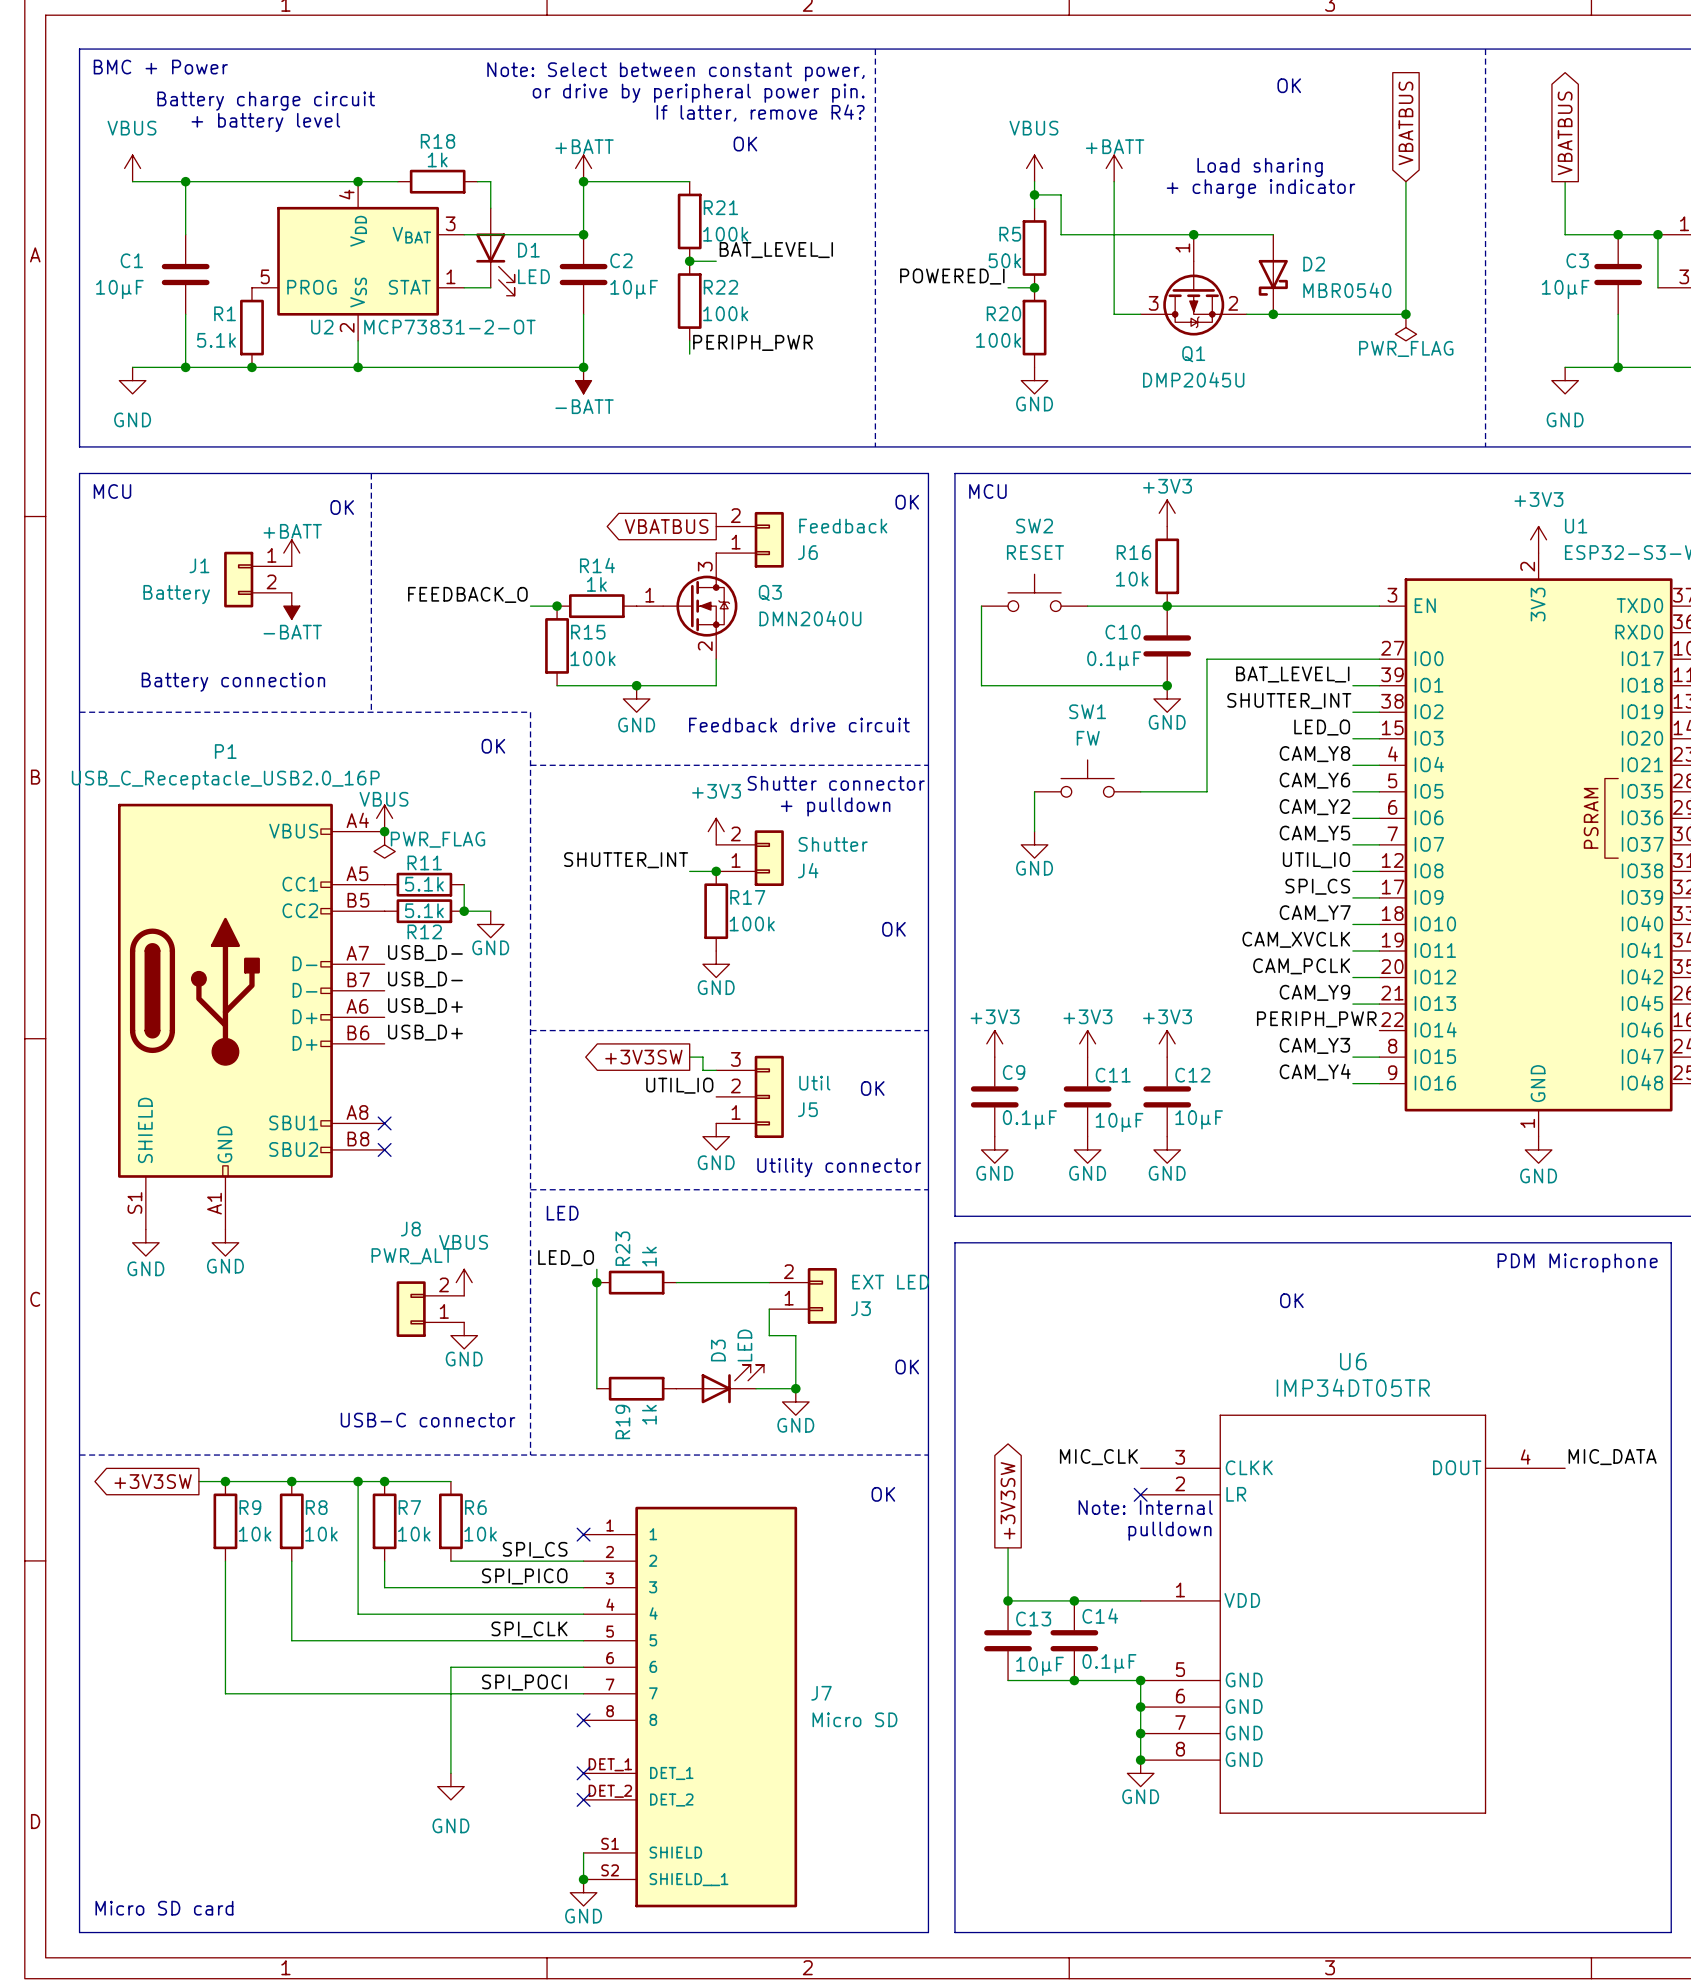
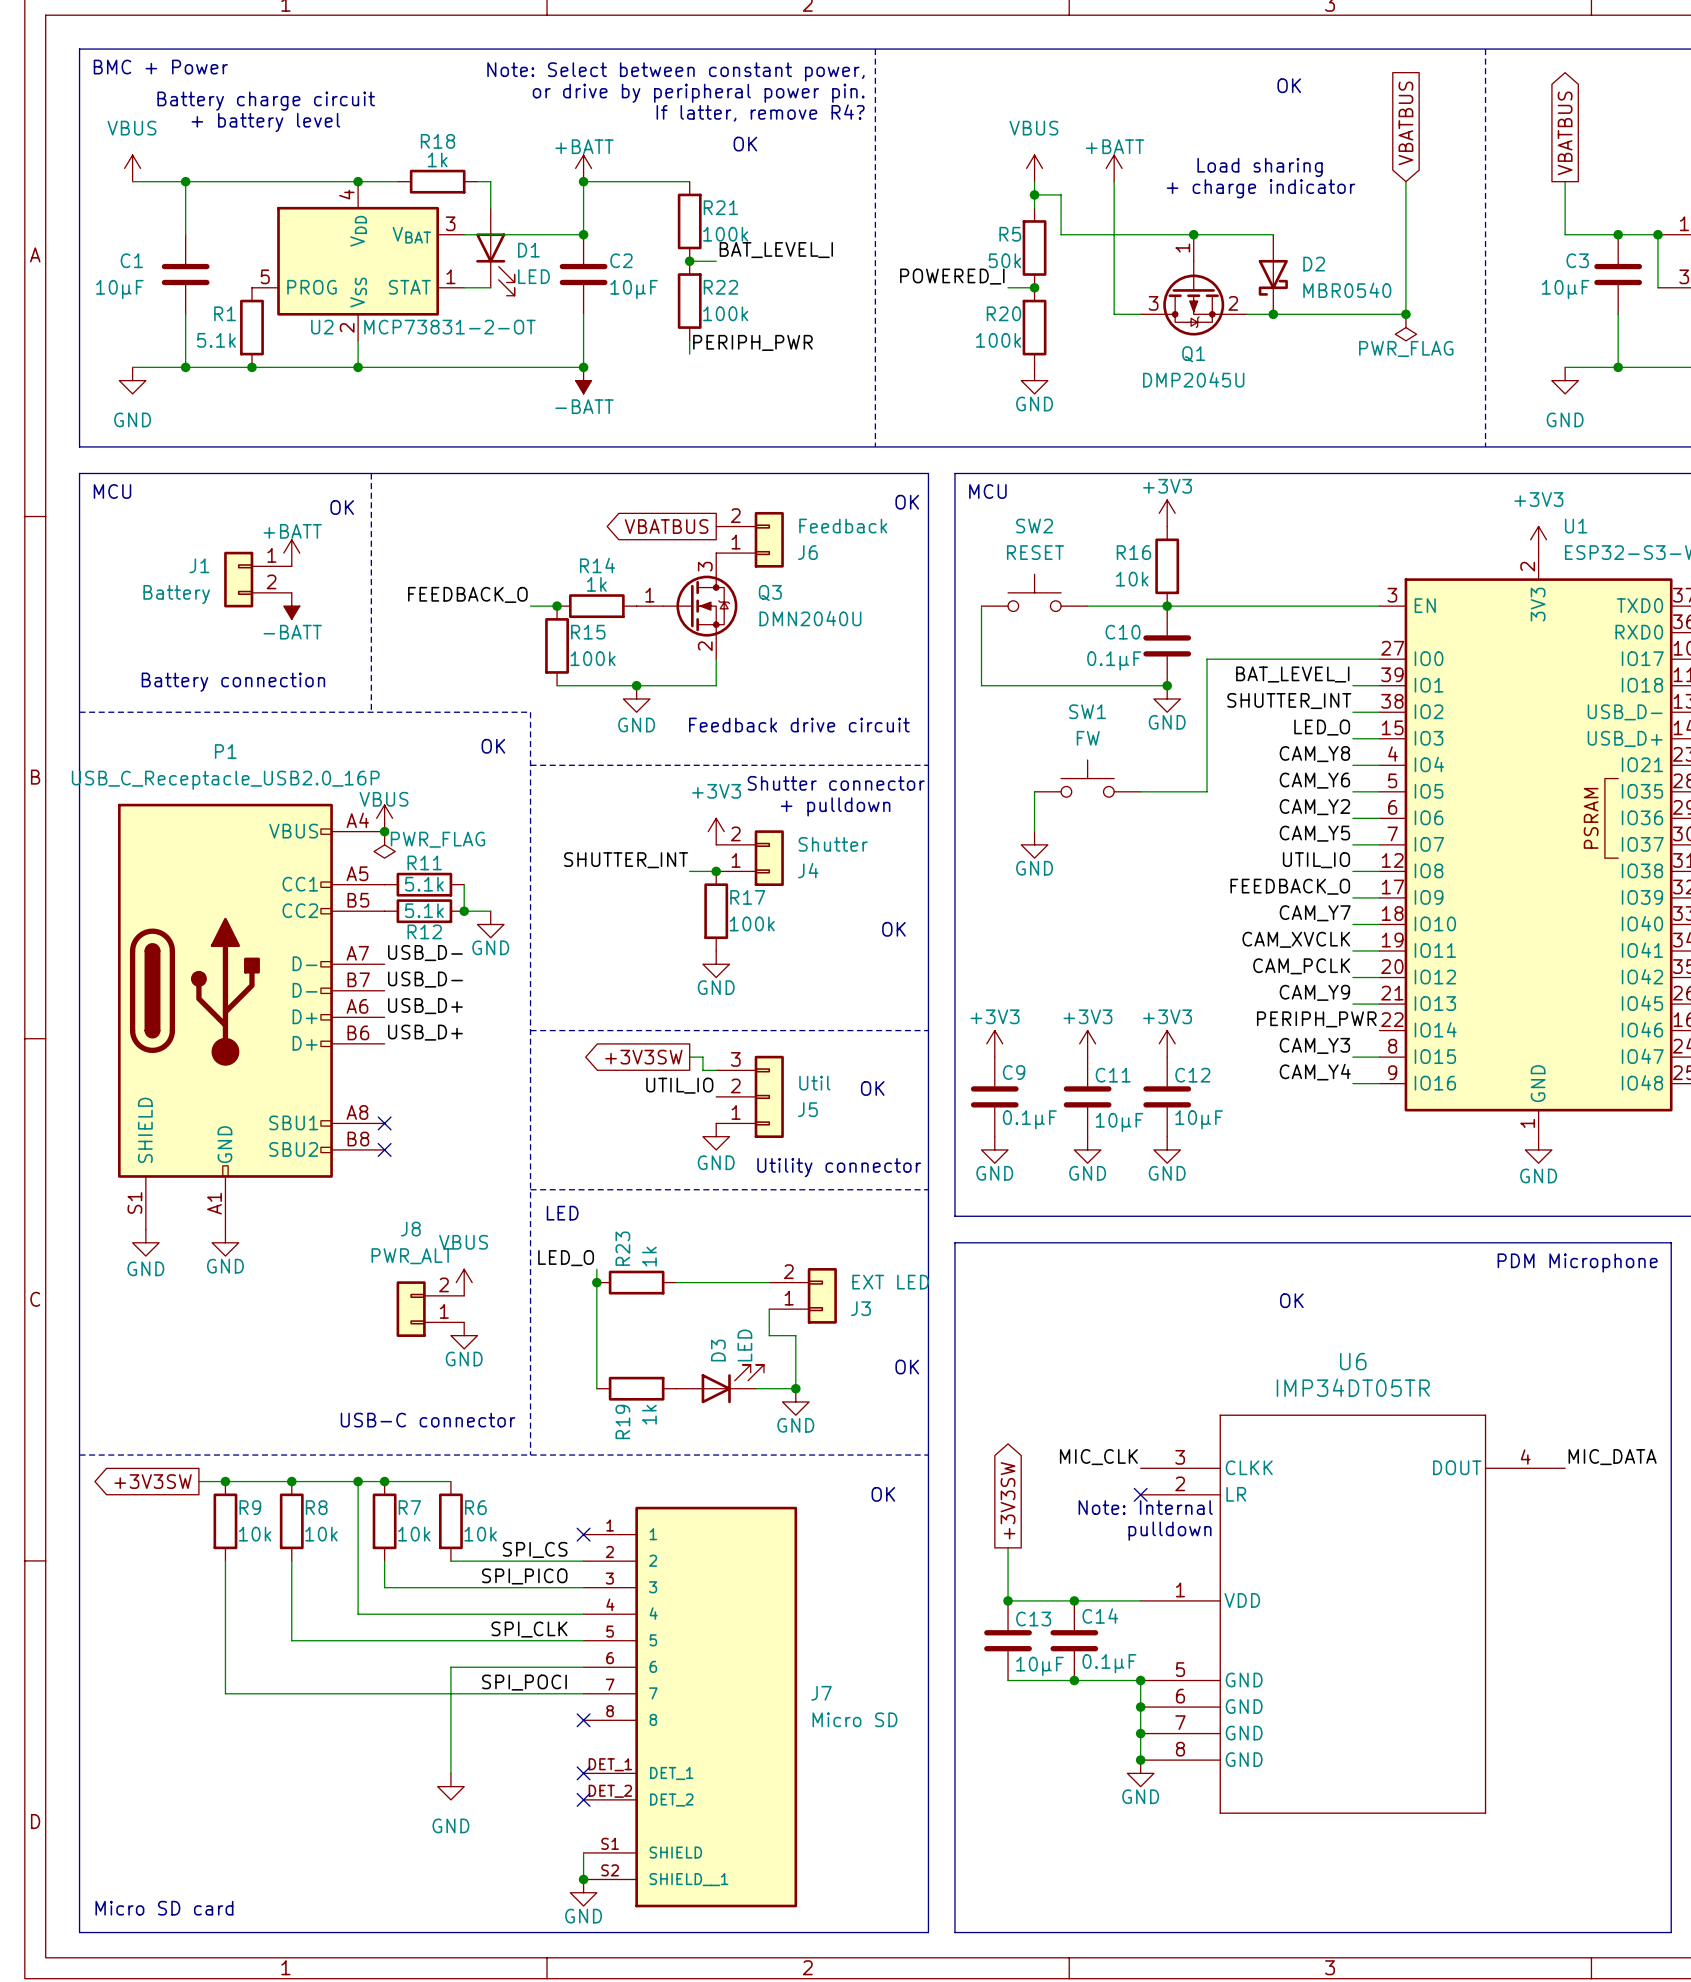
U1 pin name: IO19 (1642, 711) -> USB_D- (1625, 712)
U1 pin name: IO20 (1642, 738) -> USB_D+ (1625, 738)
label: SPI_CS (1317, 886) -> FEEDBACK_O (1290, 886)

